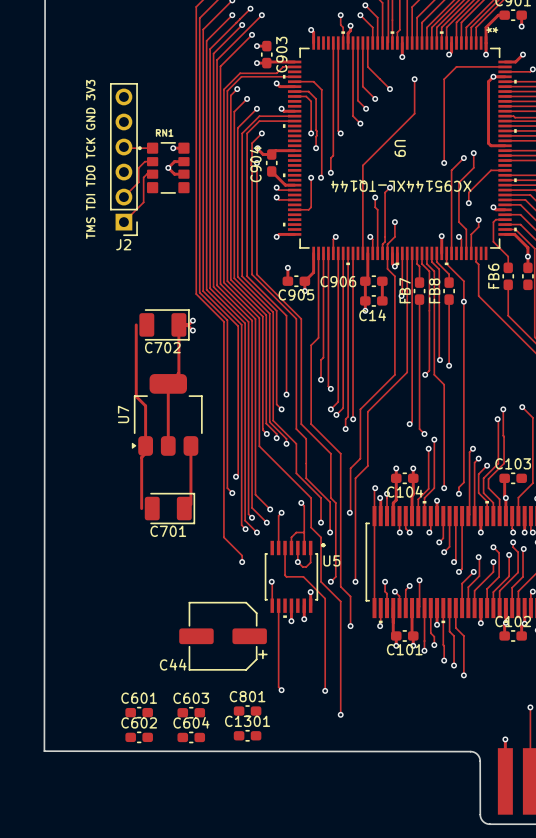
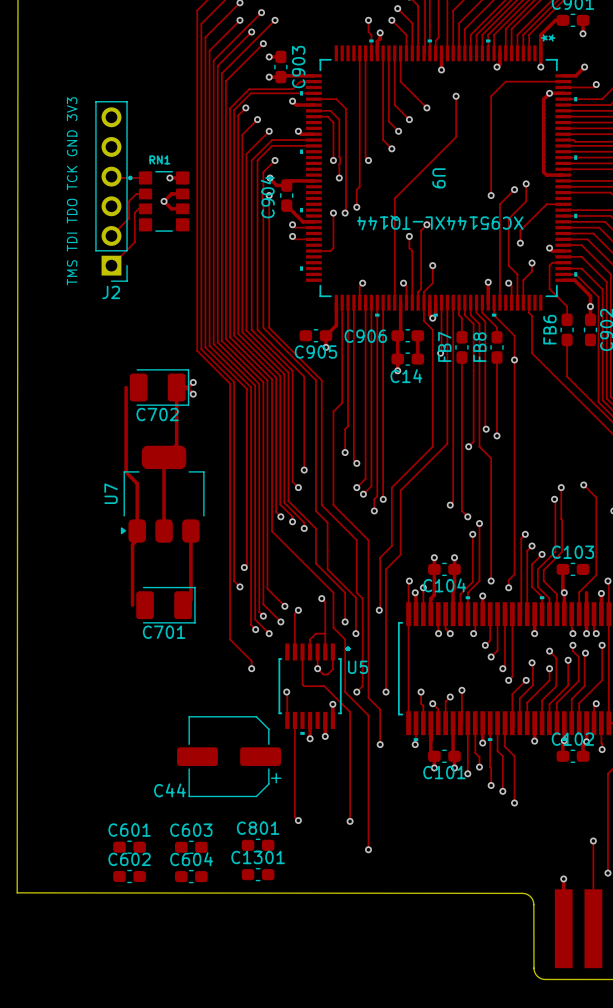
track: (311, 29) (313, 32) (313, 43) -> none
via: (311, 29) -> none
track: (294, 234) (279, 234) (276, 236) -> none
via: (276, 236) -> none
track: (287, 267) (287, 281) -> none
via: (287, 267) -> none
track: none -> (586, 592) (586, 614)

